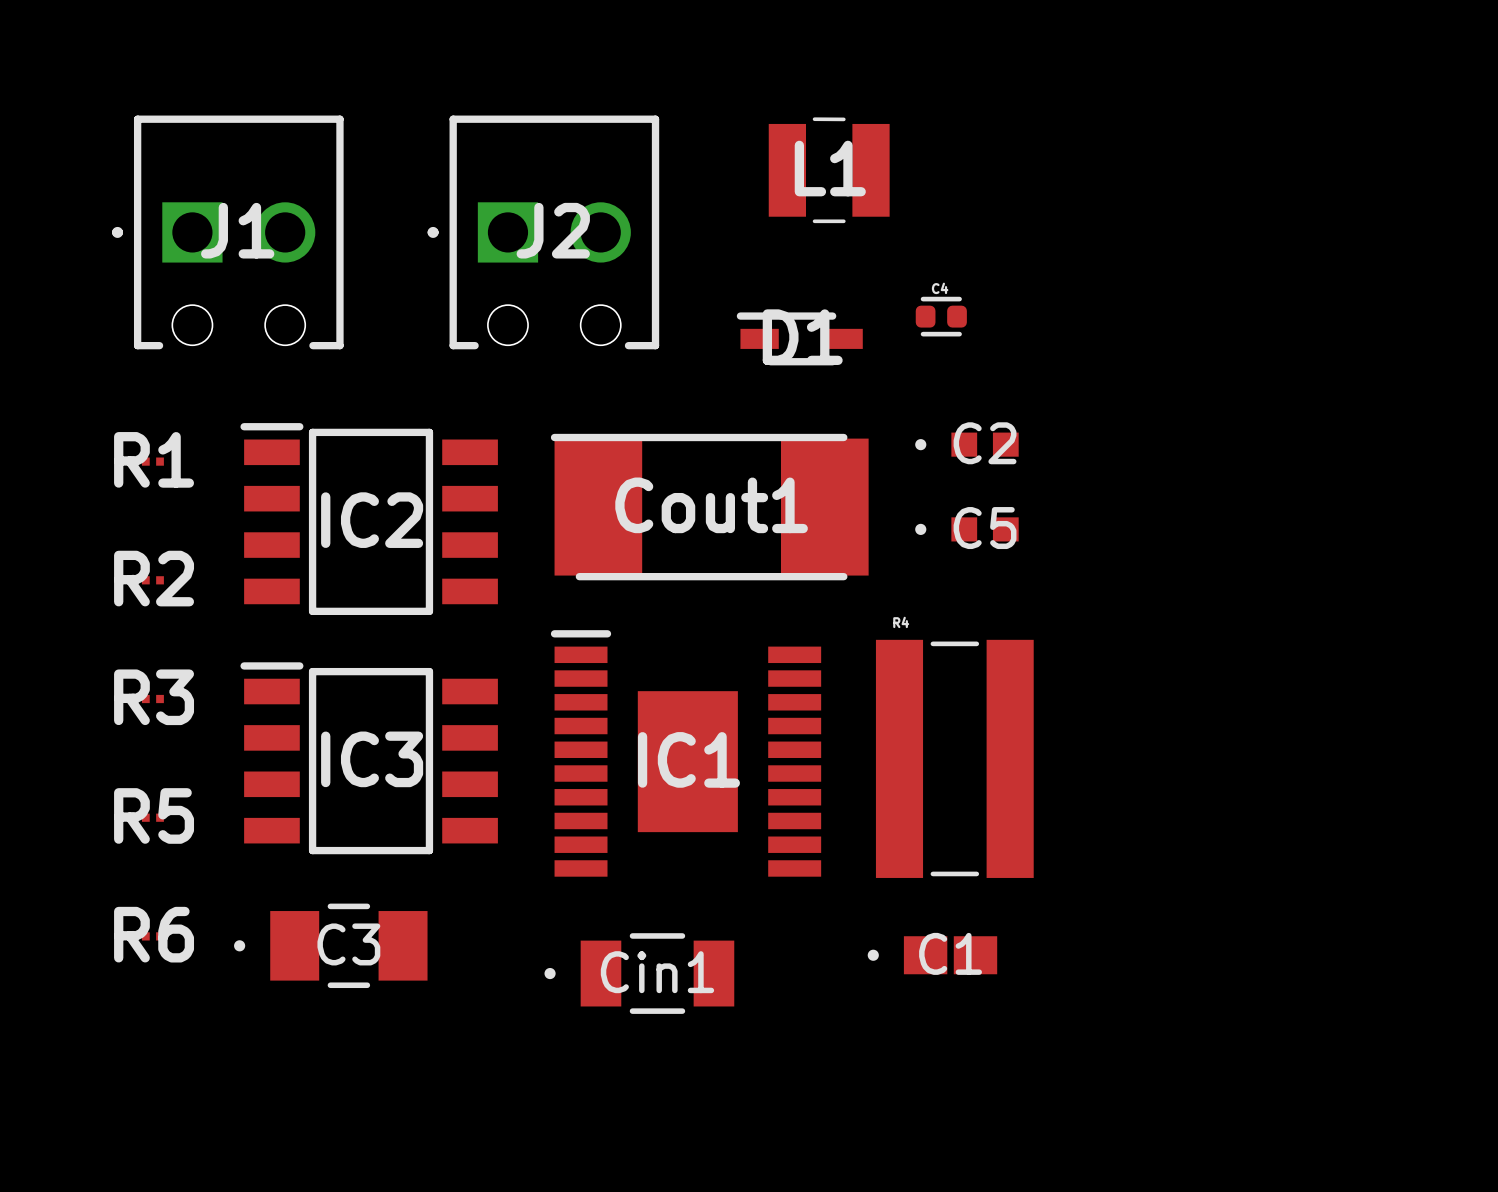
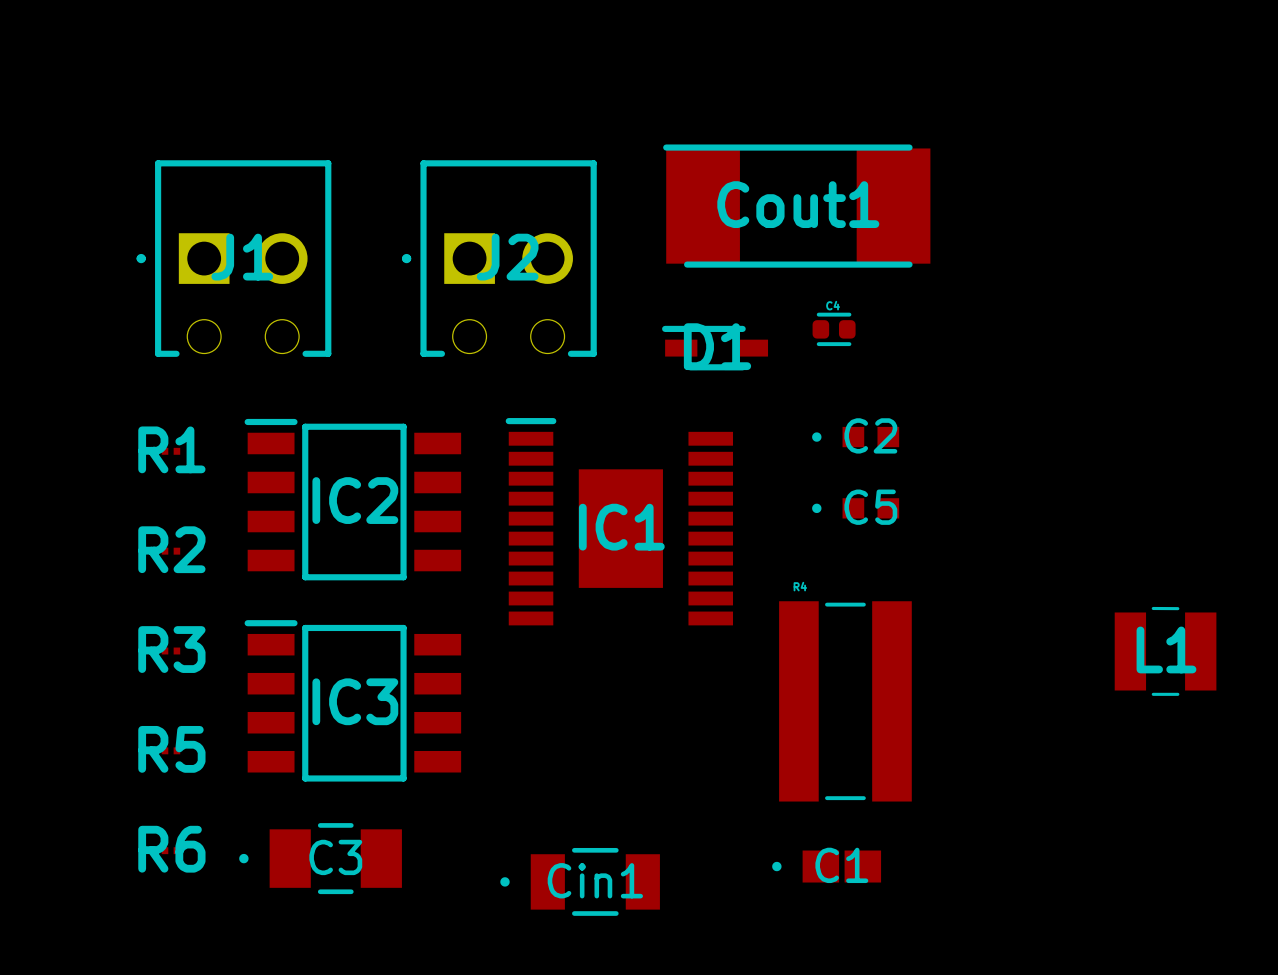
L1 position: (829, 170) -> (1165, 651)
Cout1 position: (709, 507) -> (796, 206)
IC1 position: (686, 753) -> (619, 521)

